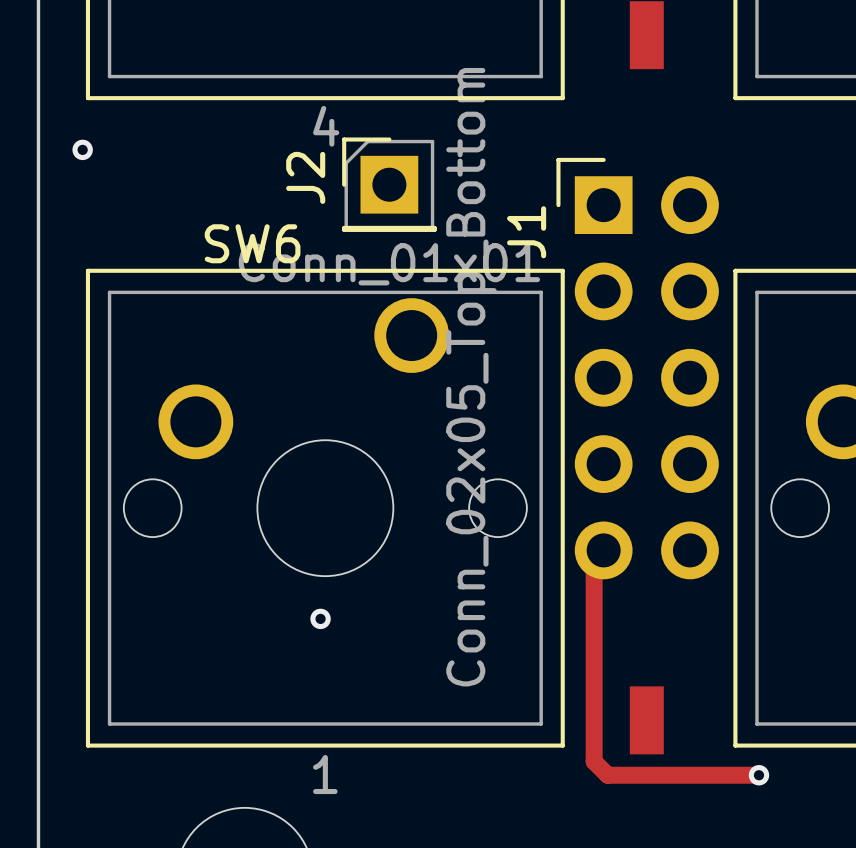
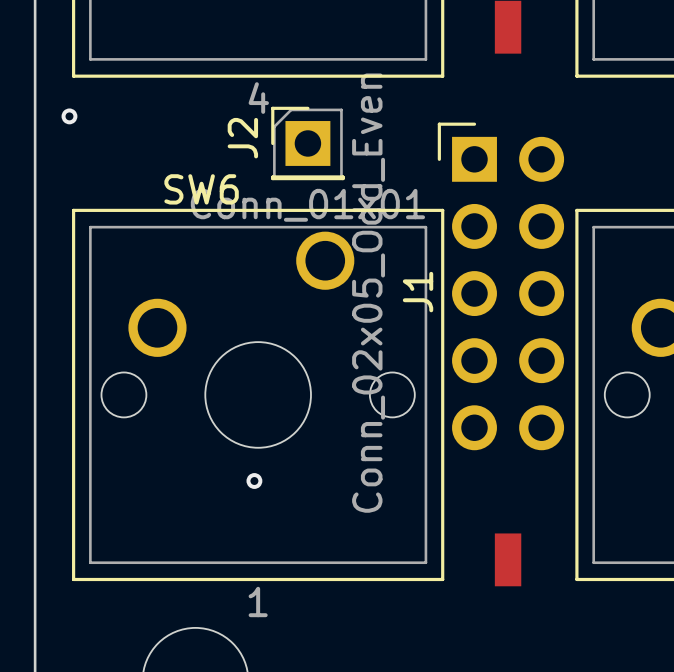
J1 name position: J1 (526, 232) -> J1 (418, 292)
J1 value: Conn_02x05_Top_Bottom (471, 377) -> Conn_02x05_Odd_Even (368, 293)
track: (603, 550) (594, 559) (594, 761) (607, 775) (758, 775) -> none
via: (758, 775) -> none

